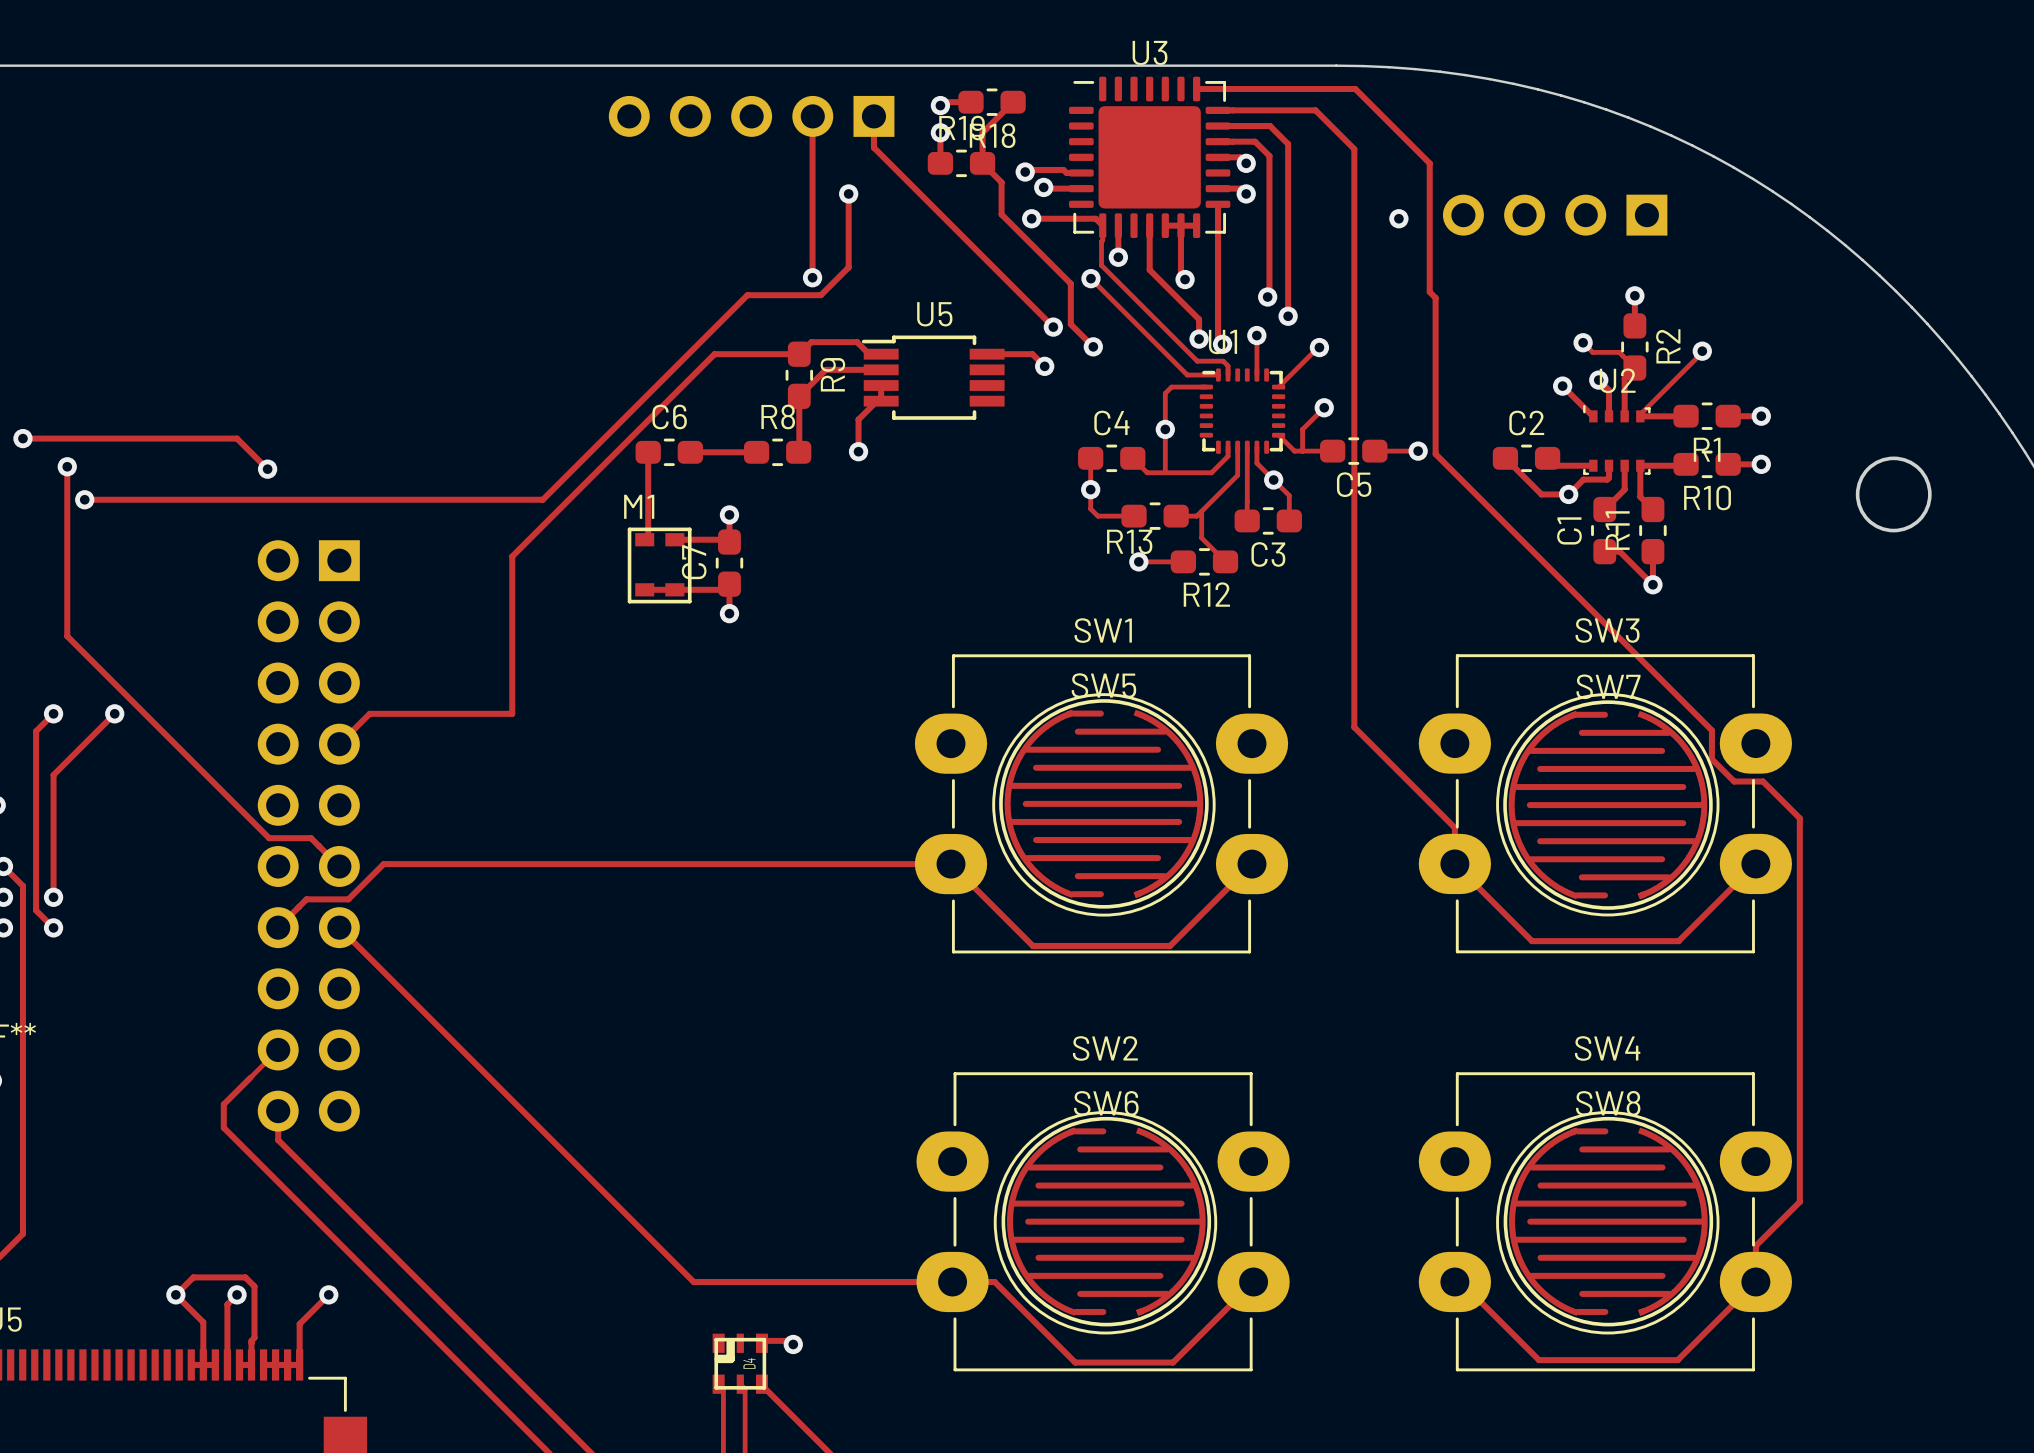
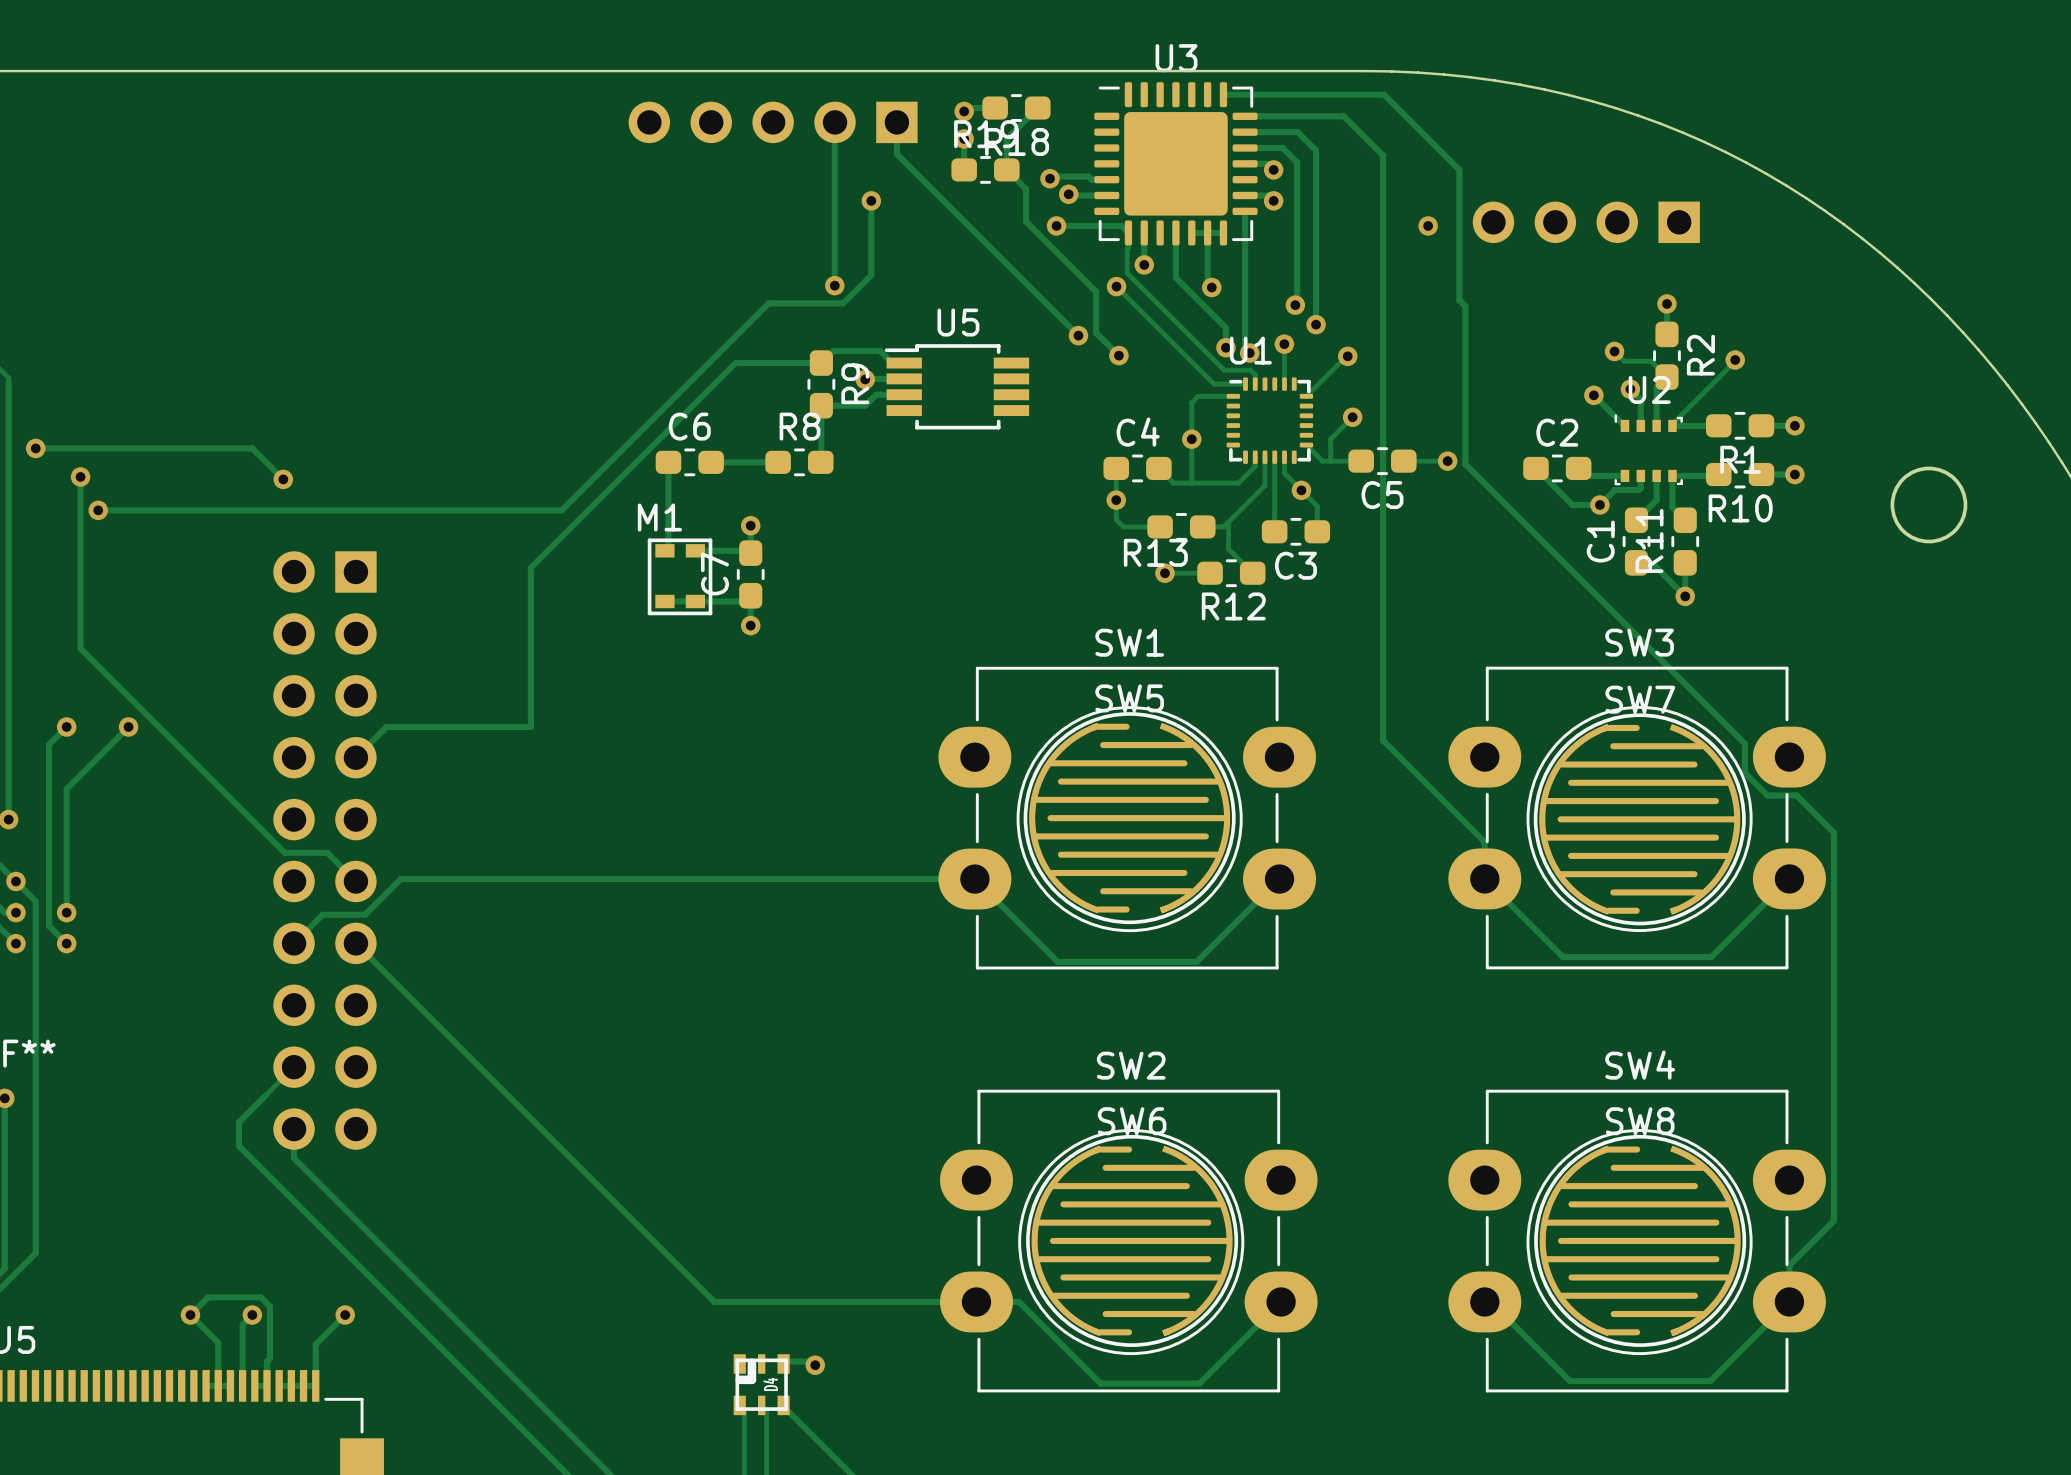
track: (987, 354) (1032, 354) (1044, 366) -> none
via: (1044, 366) -> none
track: (843, 369) (825, 369) (799, 396) -> (904, 394) (876, 394) (865, 405) (821, 405)
track: (881, 385) (881, 396) (858, 419) (858, 451) -> none
via position: (858, 451) -> (865, 379)

